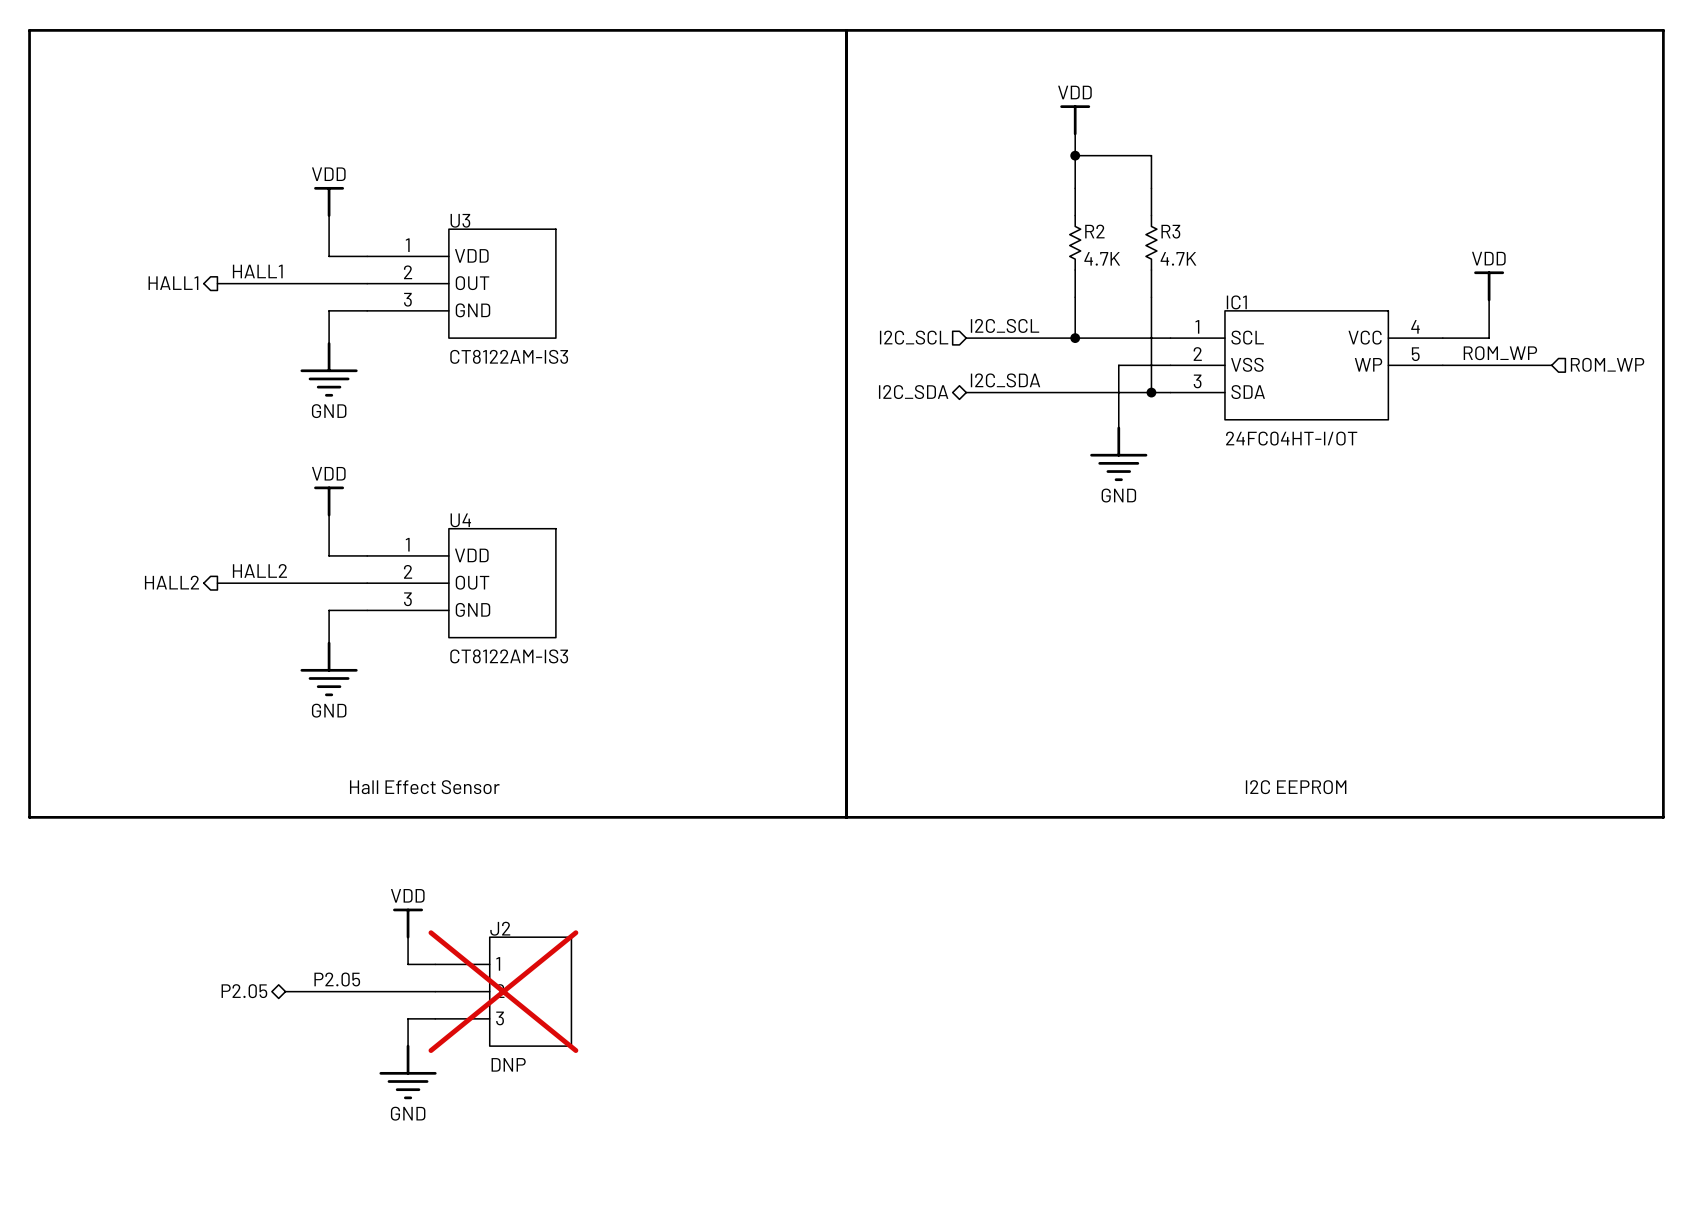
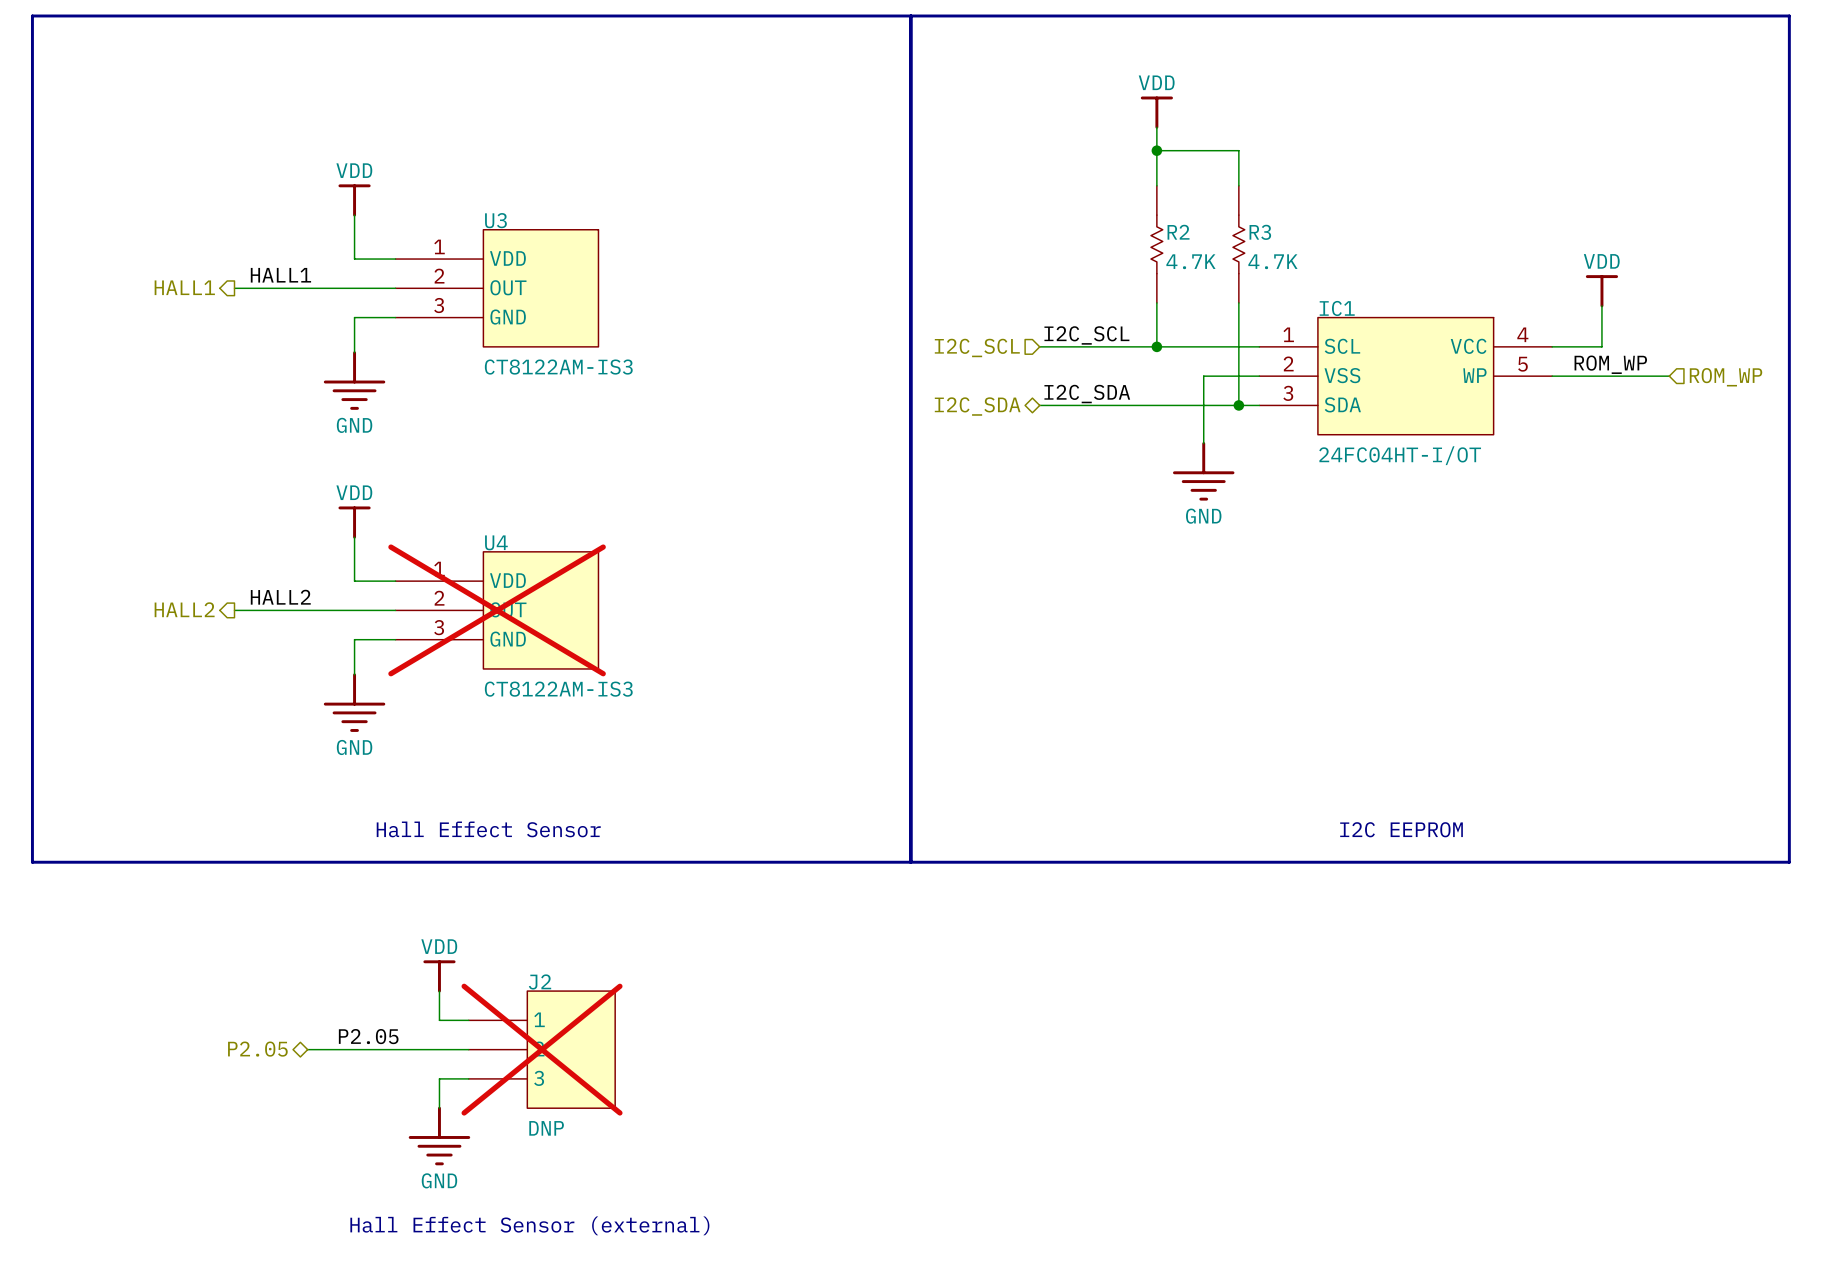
U4 do-not-place cross: none -> (497, 610)
text: none -> Hall Effect Sensor (external) (529, 1225)

